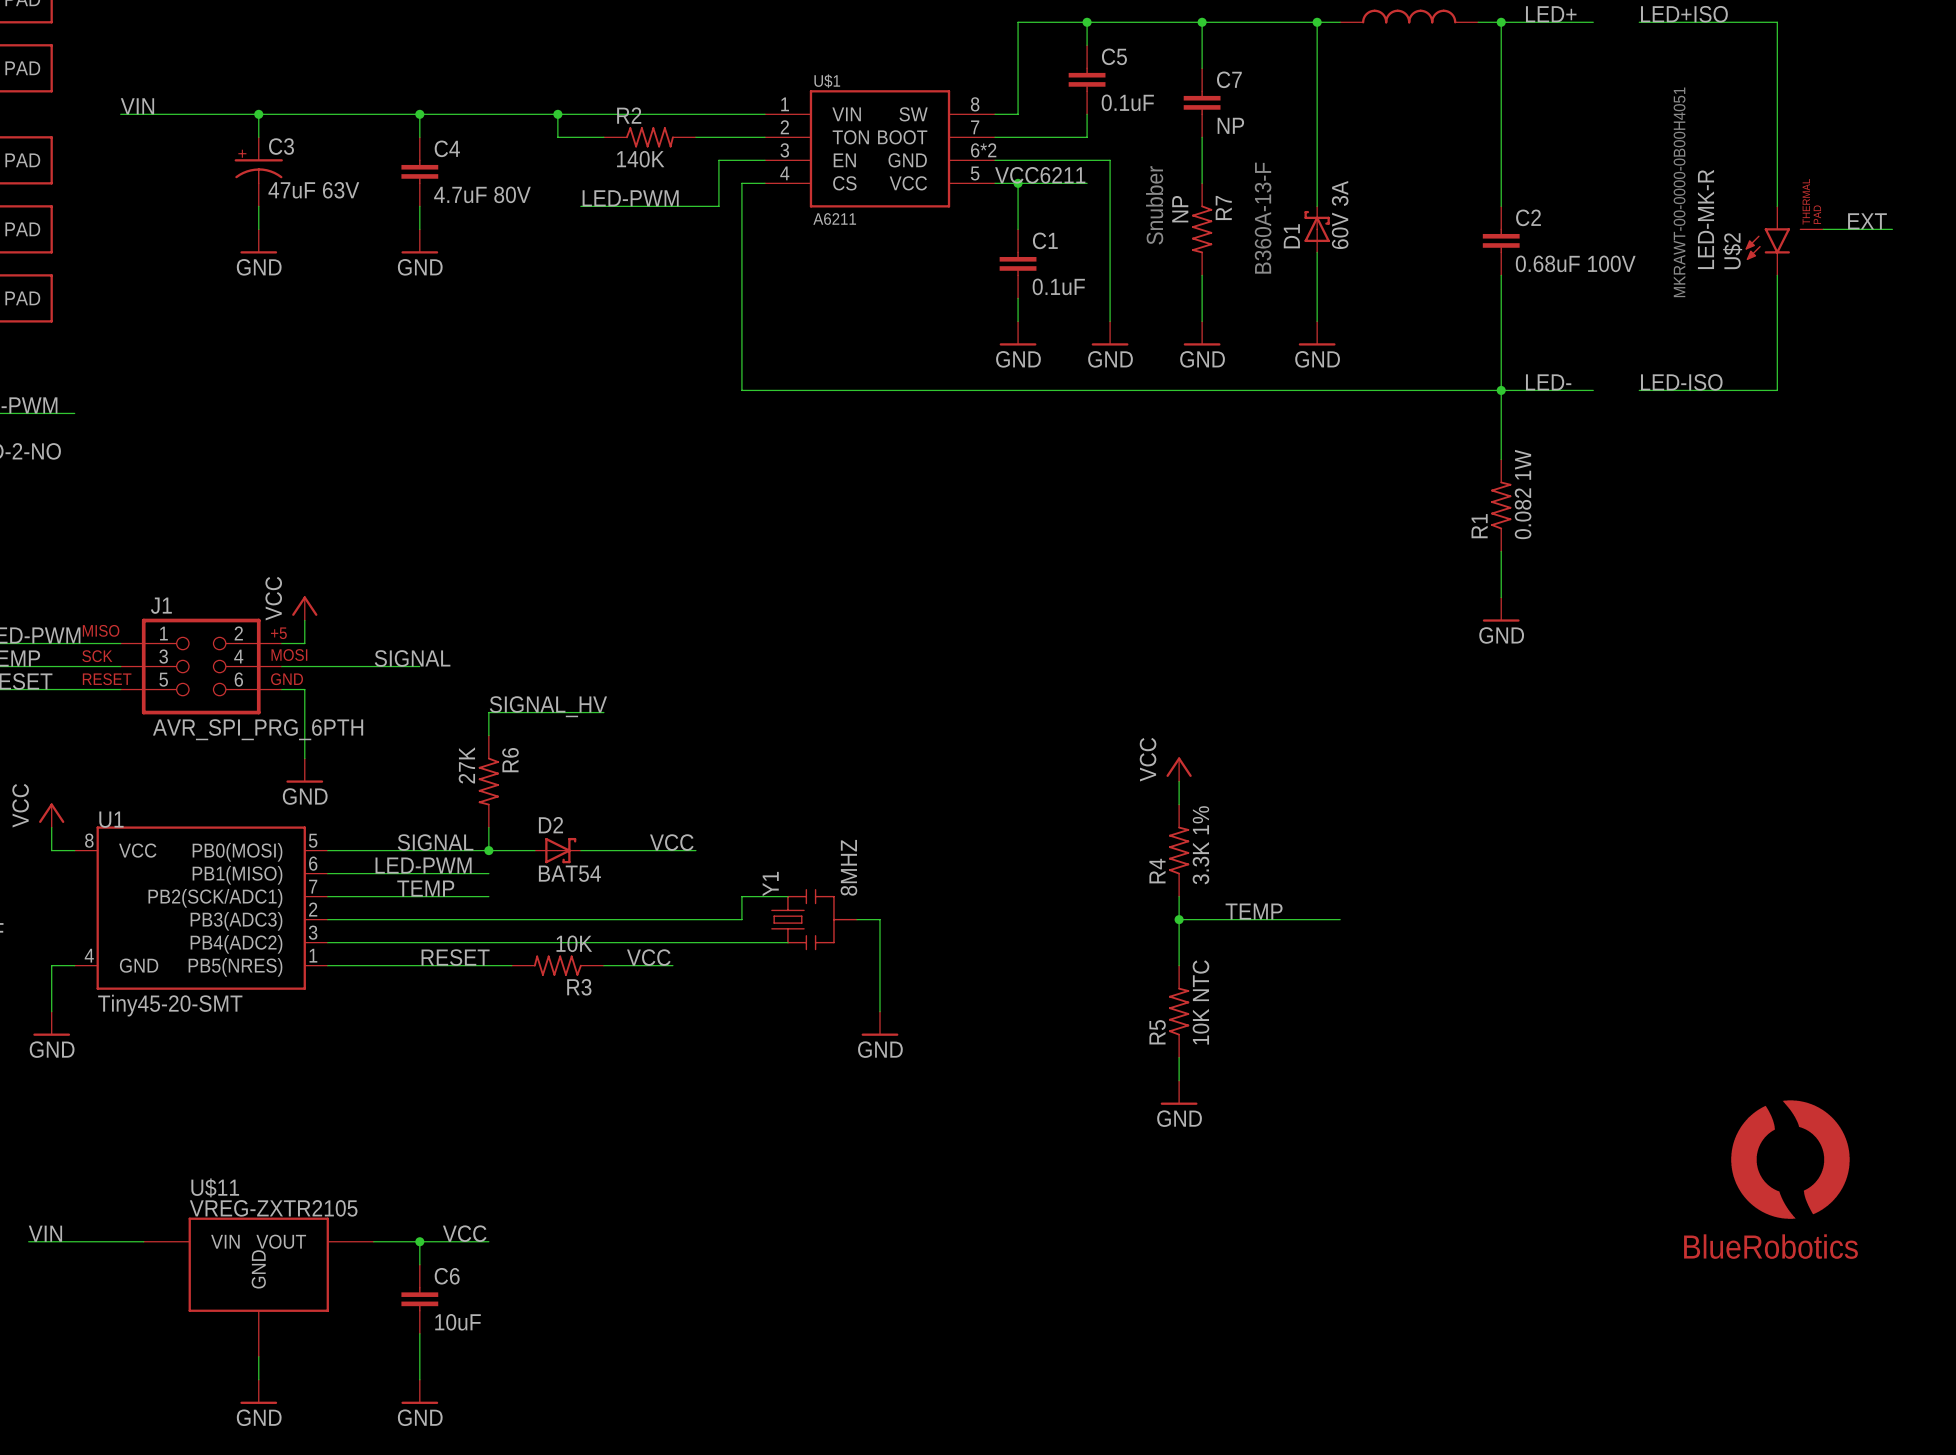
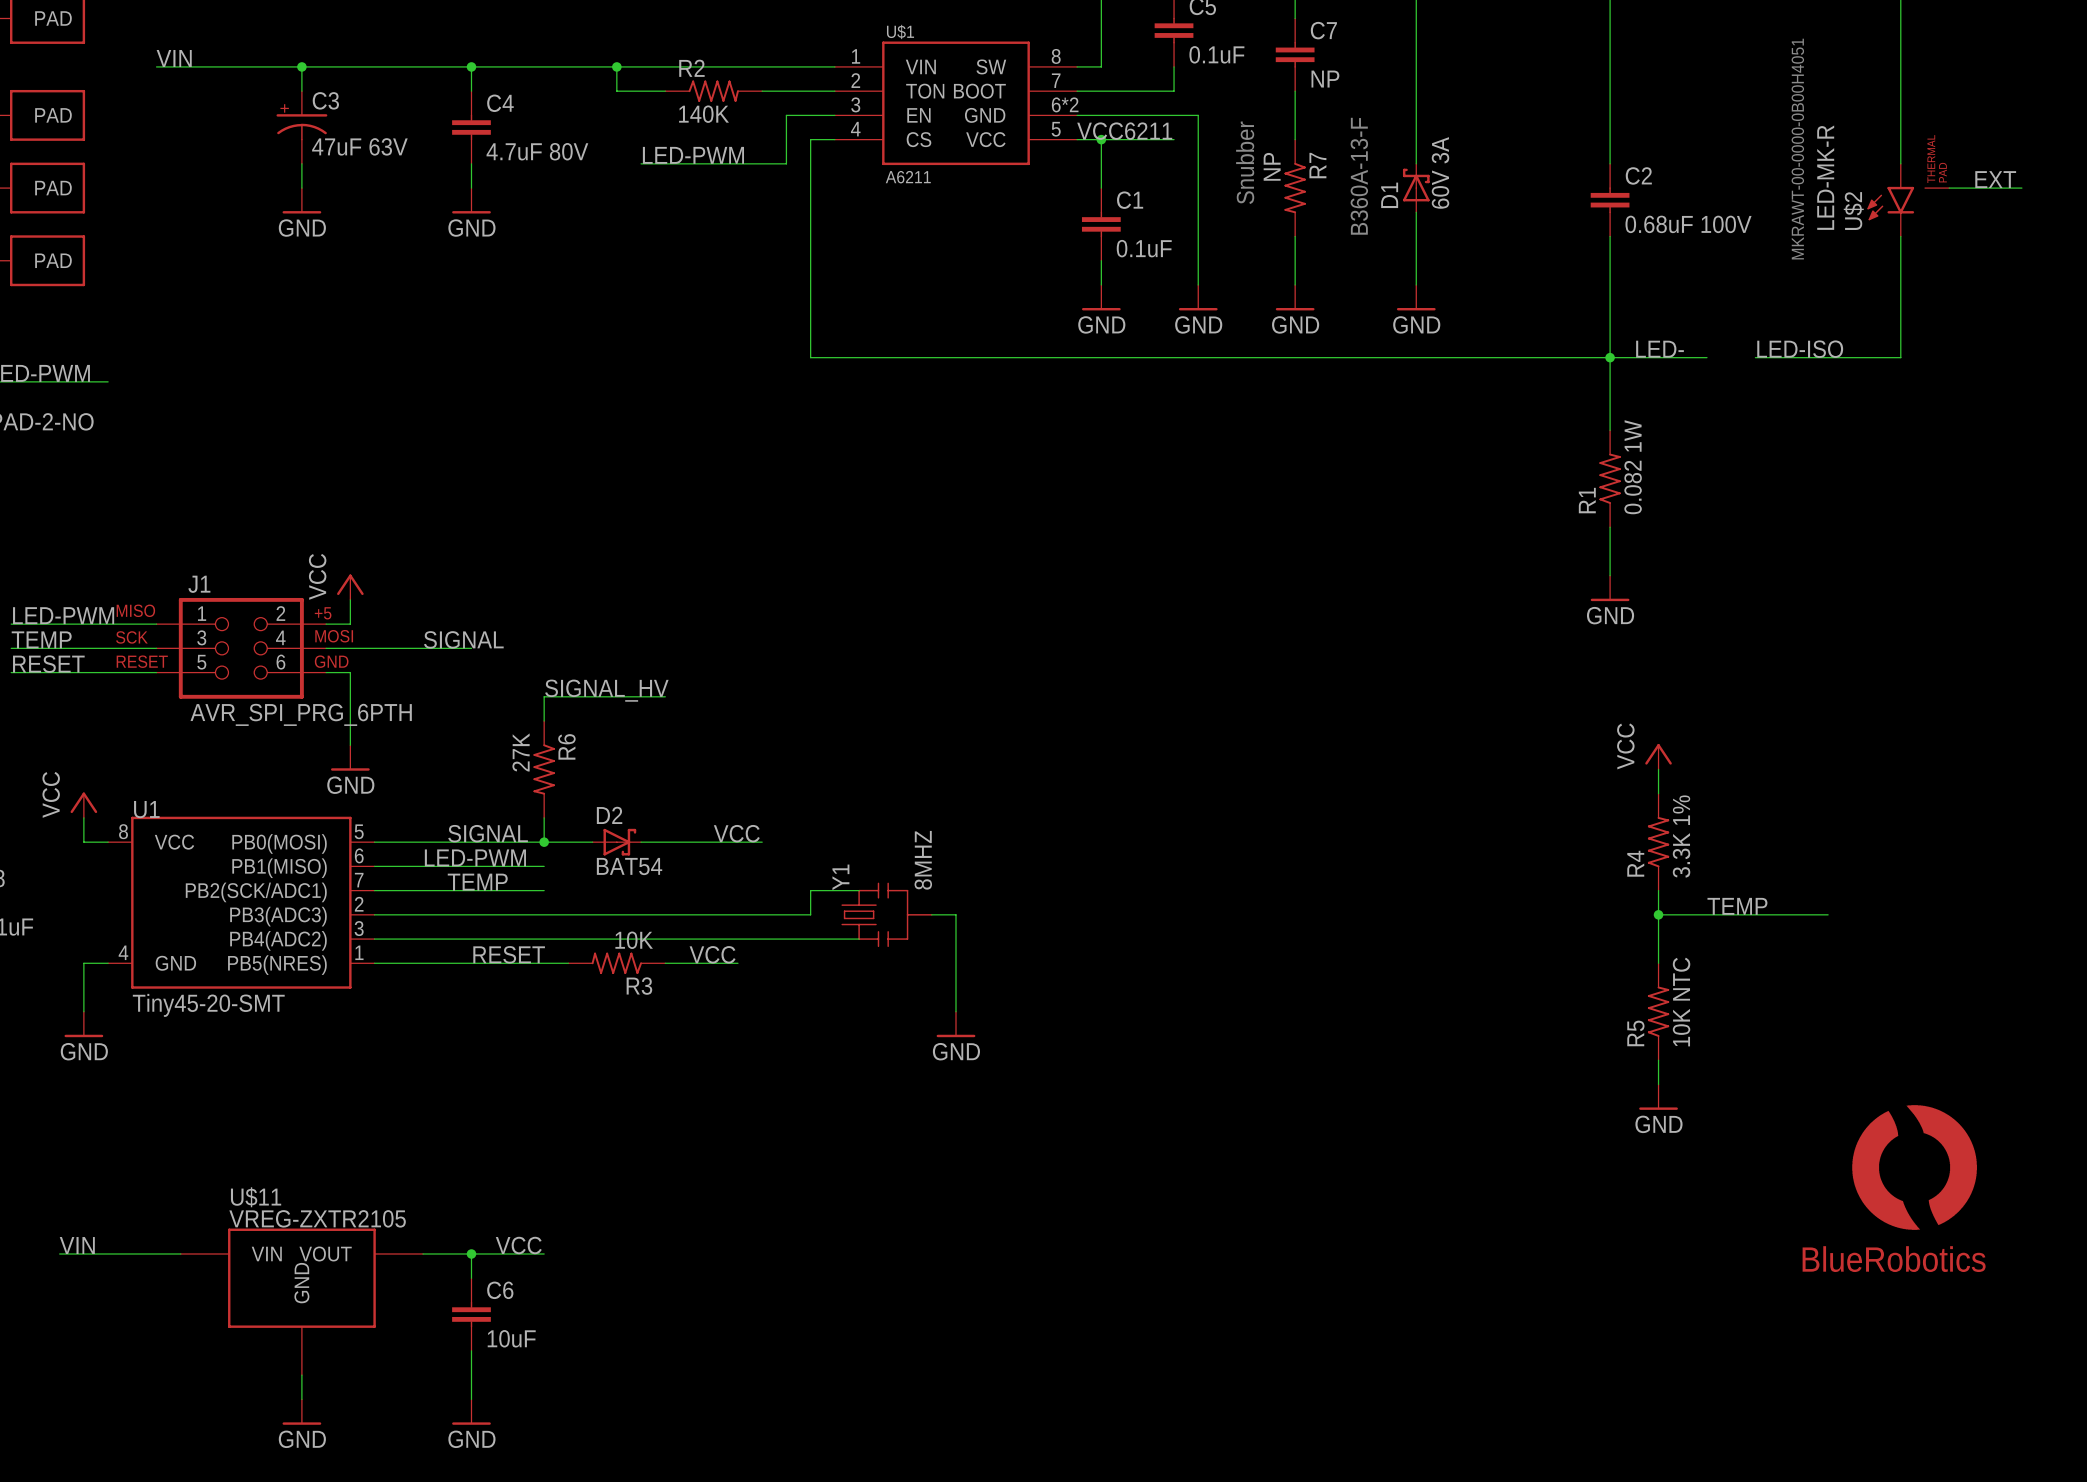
power symbol: VCC (1179, 769) -> none
power symbol: none -> VCC (1658, 756)
wire: (1179, 781) (1179, 804) -> none
wire: none -> (1658, 769) (1658, 793)
R4 position: (1179, 850) -> (1658, 842)
wire: (1179, 896) (1179, 965) -> none
wire: none -> (1658, 890) (1658, 963)
label: TEMP (1254, 911) -> none
label: none -> TEMP (1737, 906)
wire: (1179, 919) (1340, 919) -> none
junction: (1179, 919) -> none
wire: none -> (1658, 914) (1828, 914)
junction: none -> (1658, 914)
R5 position: (1179, 1011) -> (1658, 1011)
wire: (1179, 1057) (1179, 1080) -> none
wire: none -> (1658, 1060) (1658, 1084)
power symbol: GND (1179, 1092) -> none
power symbol: none -> GND (1658, 1097)

